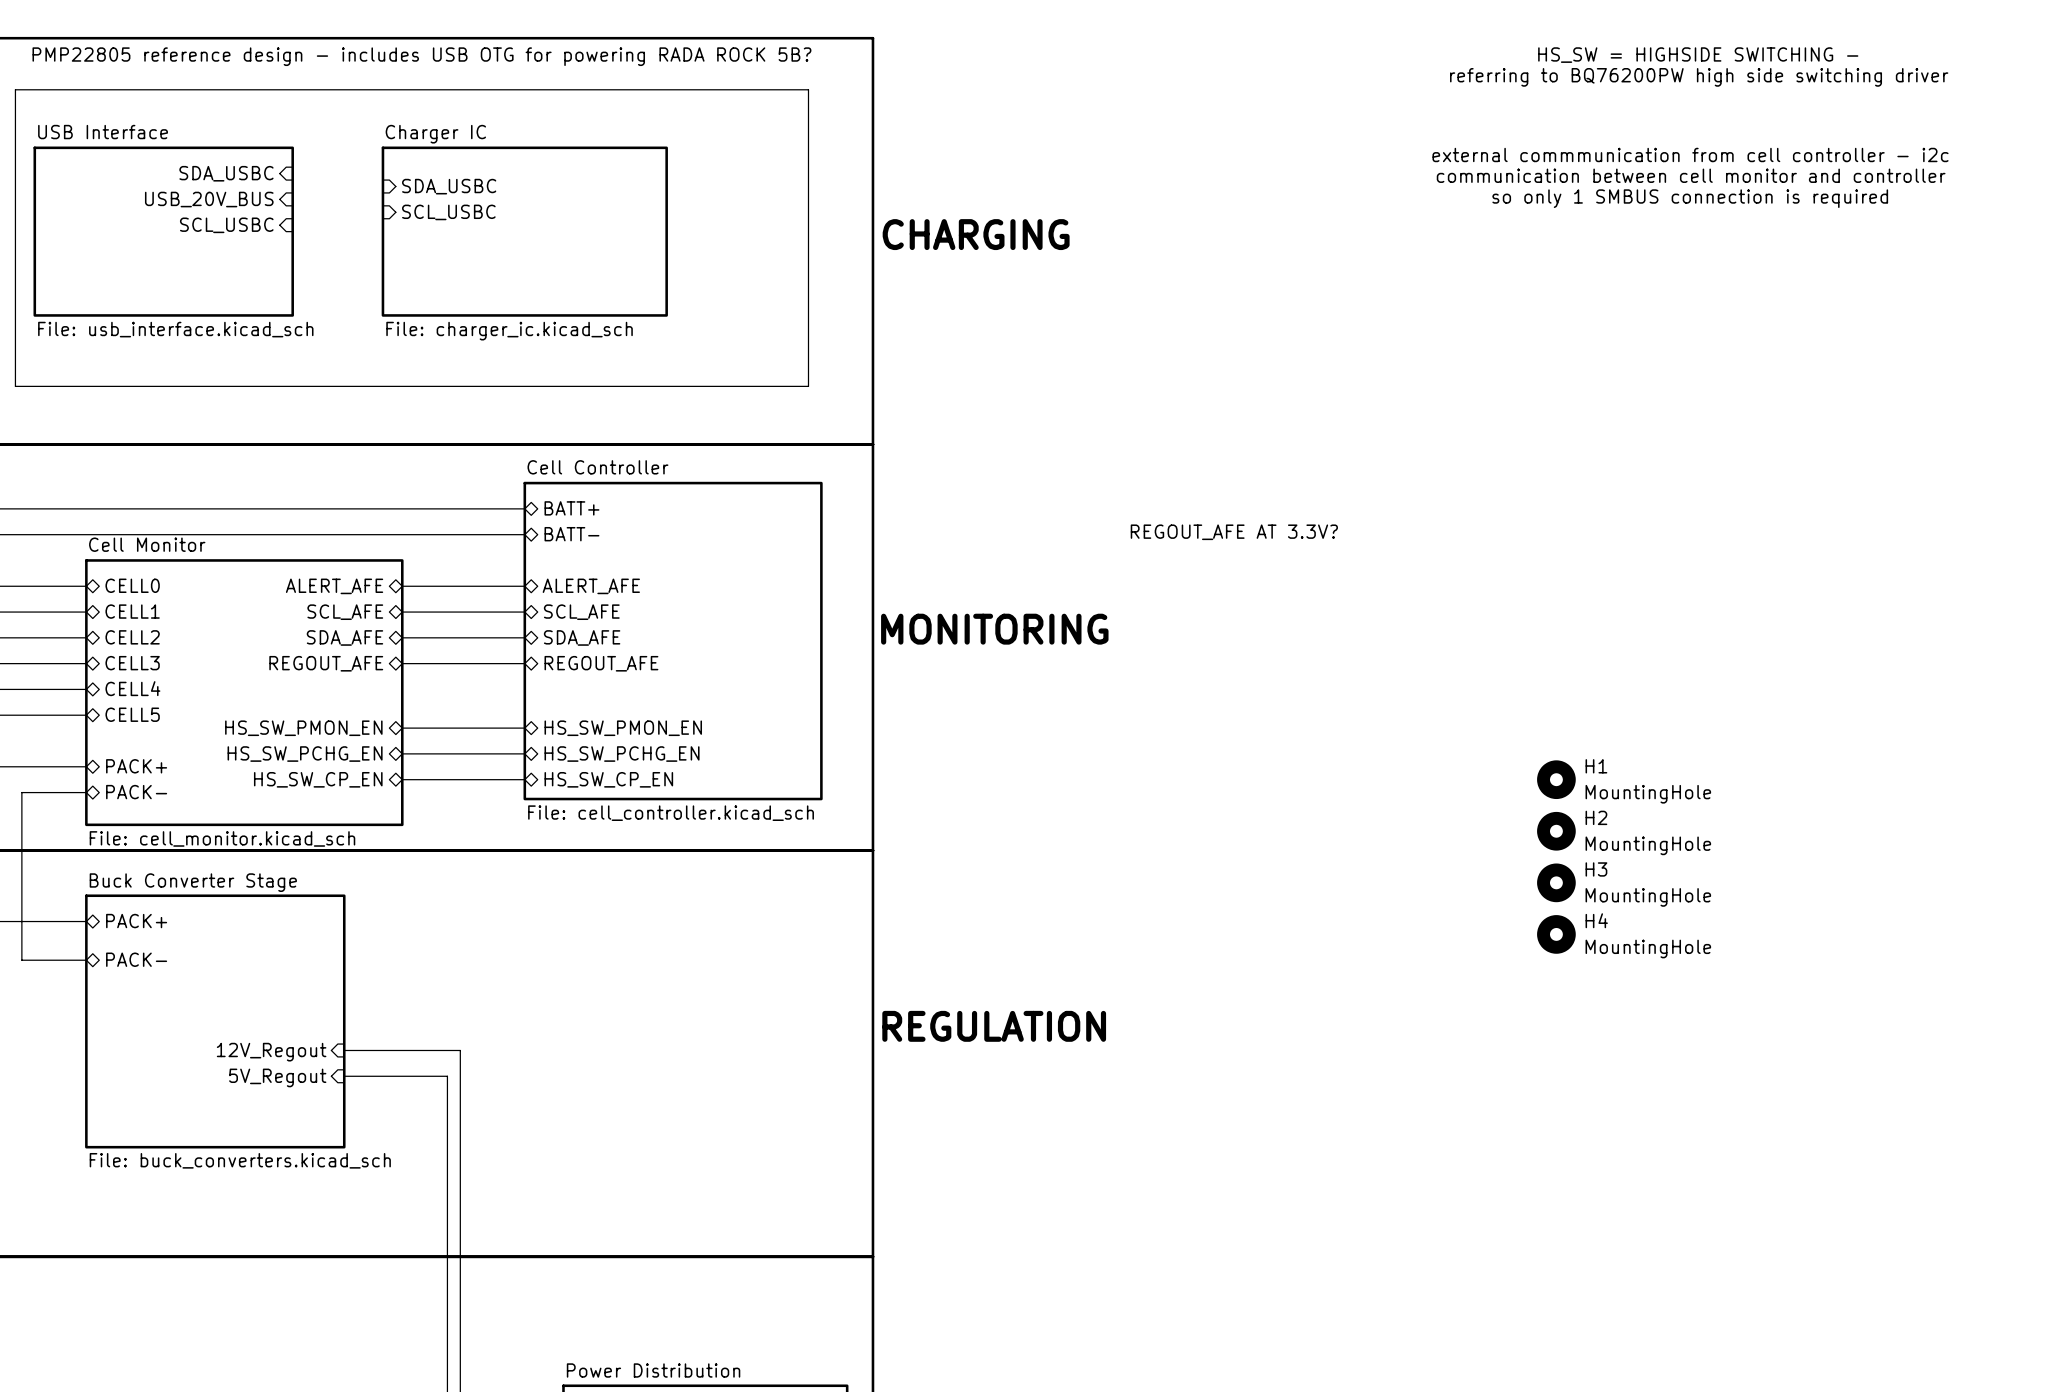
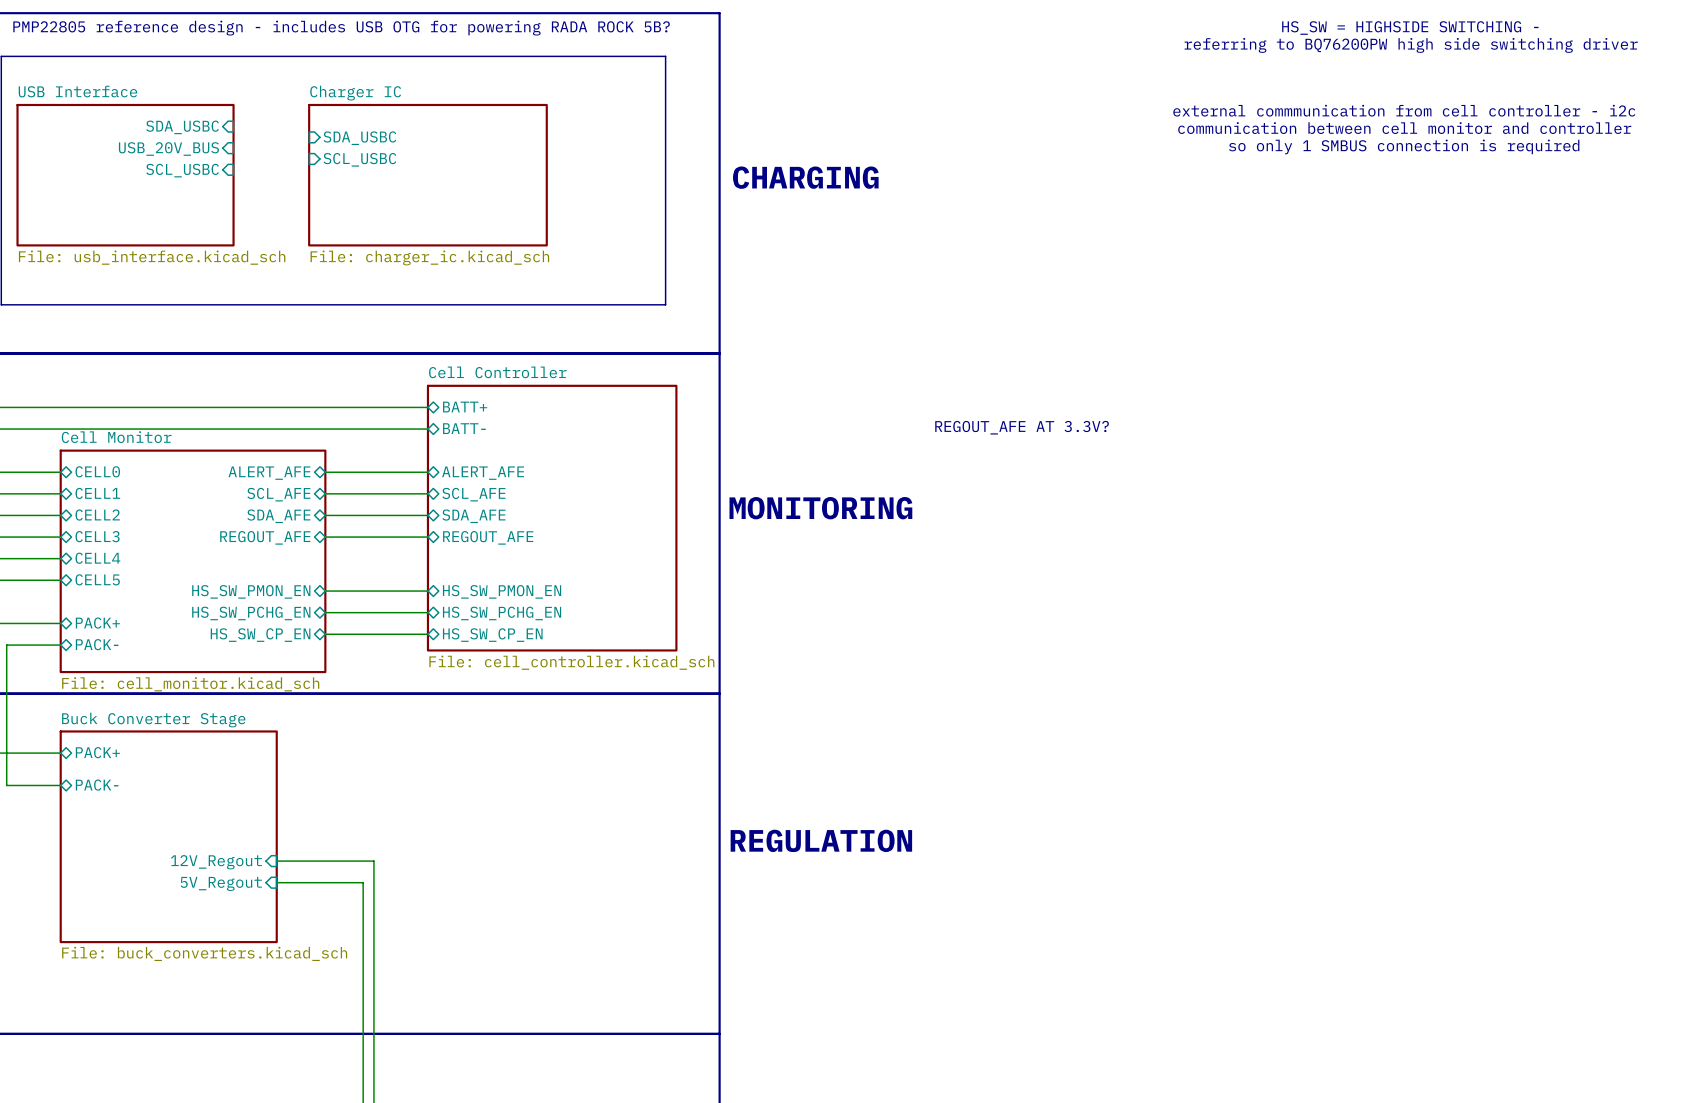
H1: MountingHole (1556, 779) -> none
H2: MountingHole (1556, 831) -> none
H3: MountingHole (1556, 882) -> none
H4: MountingHole (1556, 934) -> none

